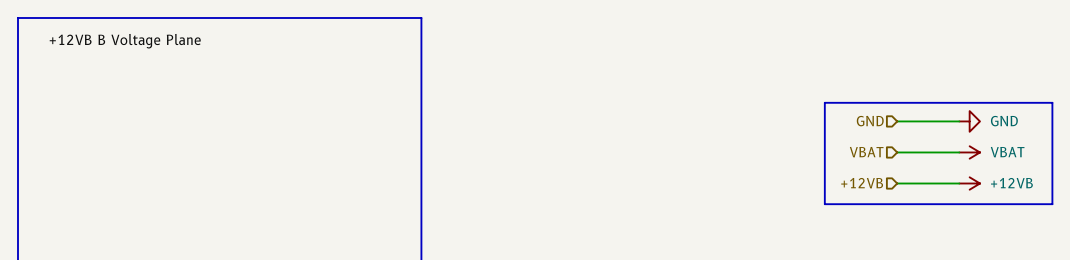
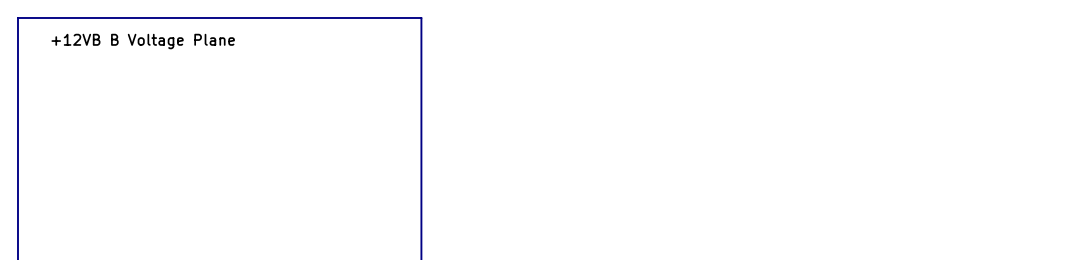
line: (824, 102) (1052, 102) (1052, 204) (824, 204) (824, 102) -> none
hierarchical label: GND (870, 121) -> none
wire: (897, 121) (959, 121) -> none
power symbol: GND (969, 121) -> none
hierarchical label: VBAT (866, 152) -> none
wire: (897, 152) (959, 152) -> none
power symbol: VBAT (969, 152) -> none
hierarchical label: +12VB (862, 183) -> none
wire: (897, 183) (959, 183) -> none
power symbol: +12VB (969, 183) -> none

